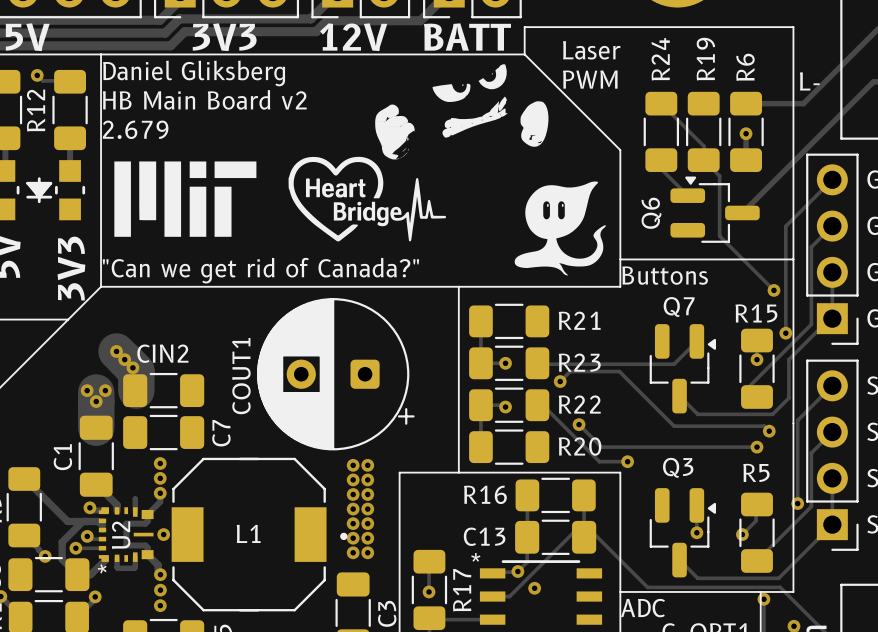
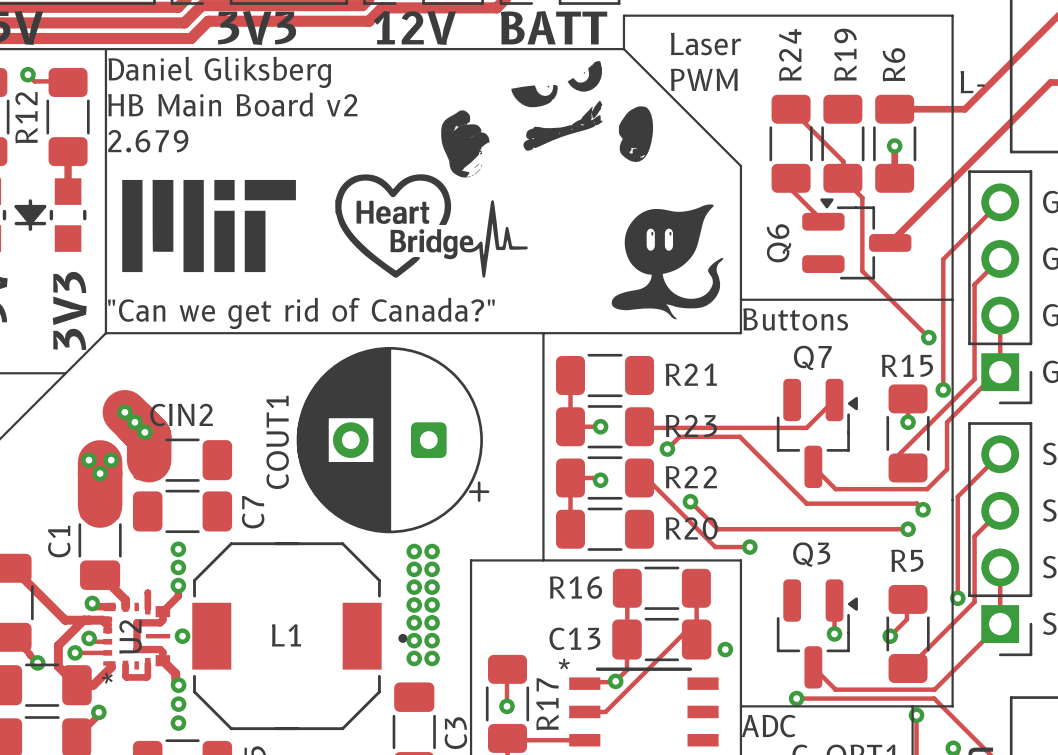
track: (584, 537) (588, 532) (593, 532) (647, 587) (780, 587) -> (796, 698) (934, 698) (936, 700)
via: none -> (725, 649)
via: none -> (796, 698)
via: (534, 588) -> none

